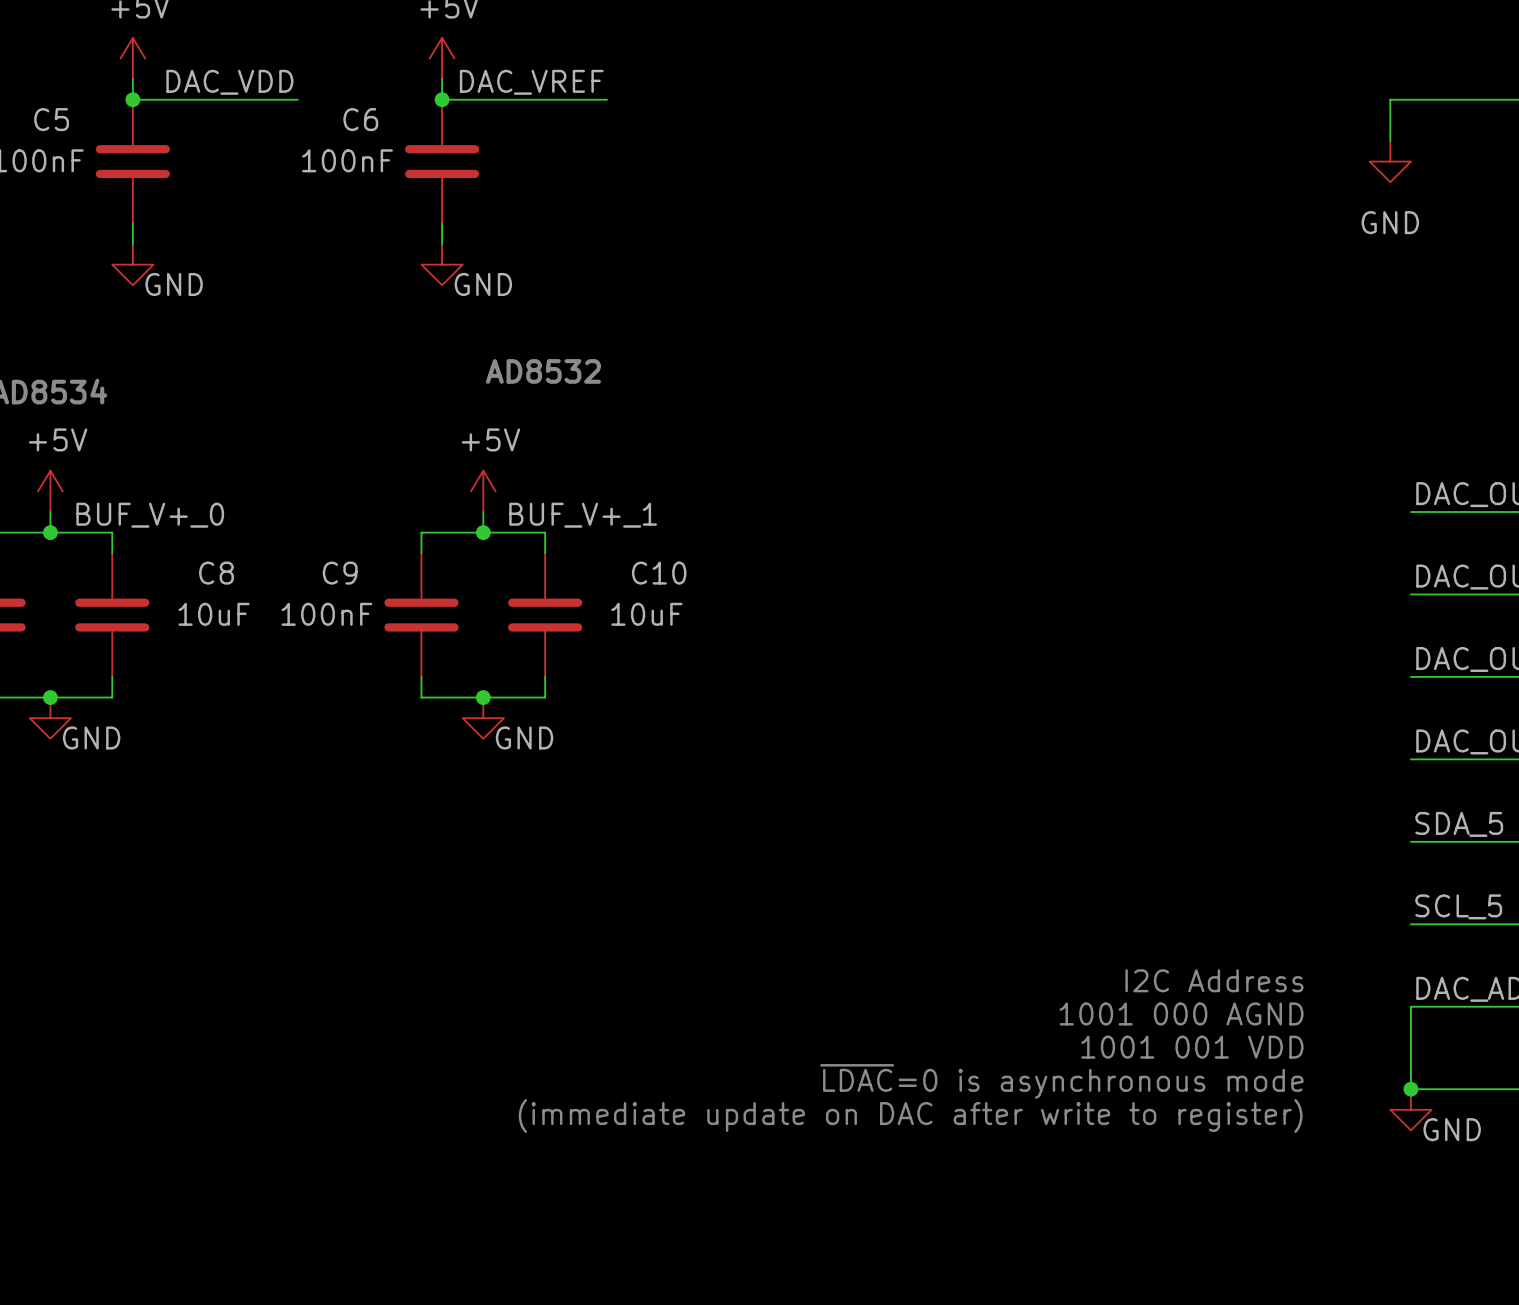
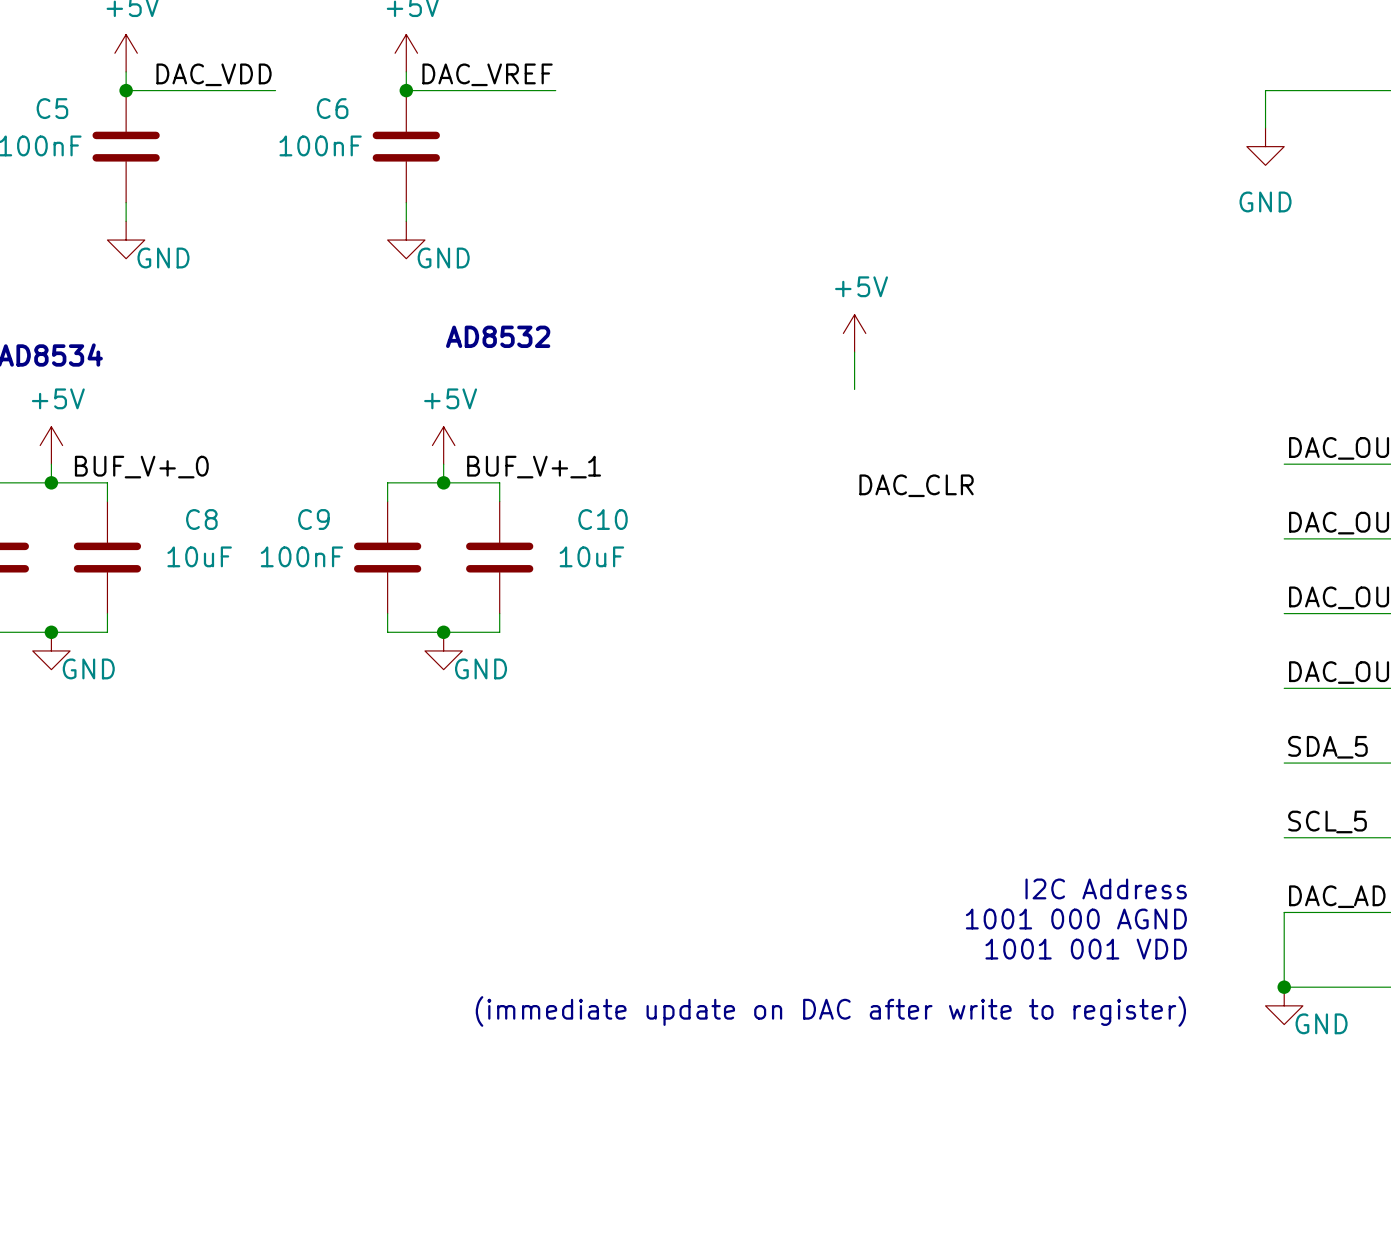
power symbol: none -> +5V (854, 333)
wire: none -> (854, 352) (854, 389)
label: none -> DAC_CLR (916, 485)
text: ~{LDAC}=0 is asynchronous mode (1061, 1081) -> none

